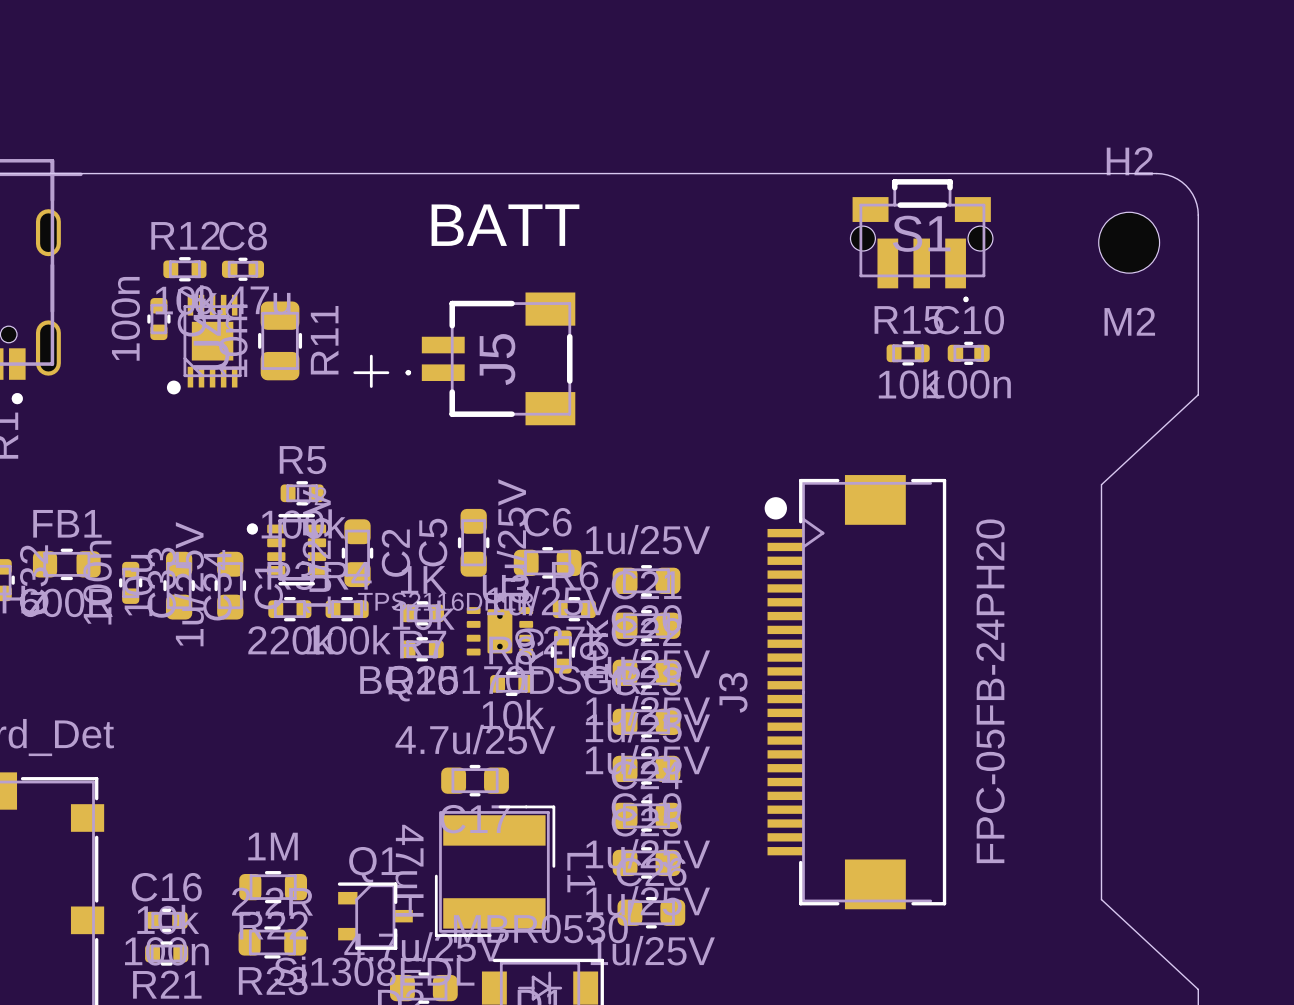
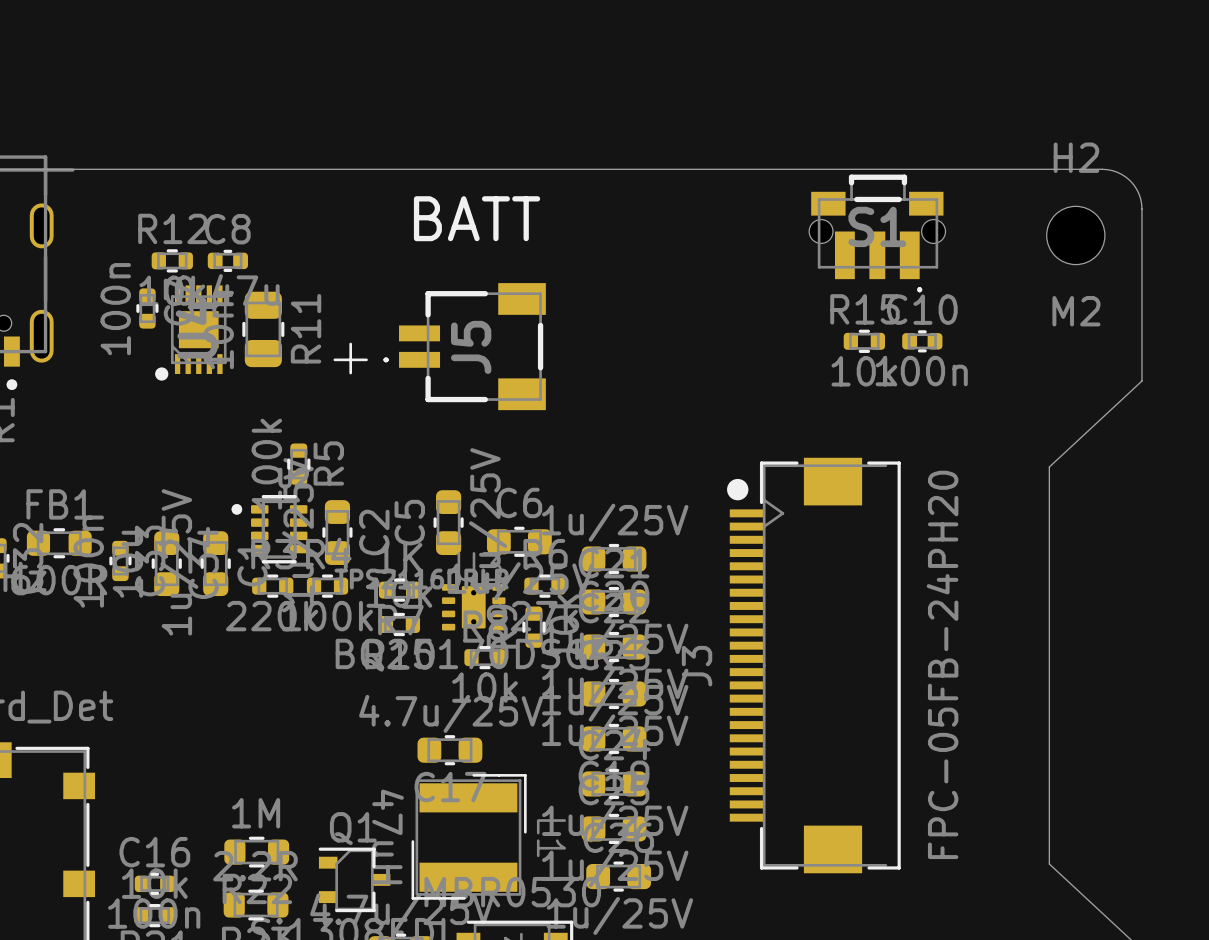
R5 rotation: 0° (302, 493) -> 90° clockwise (298, 464)

